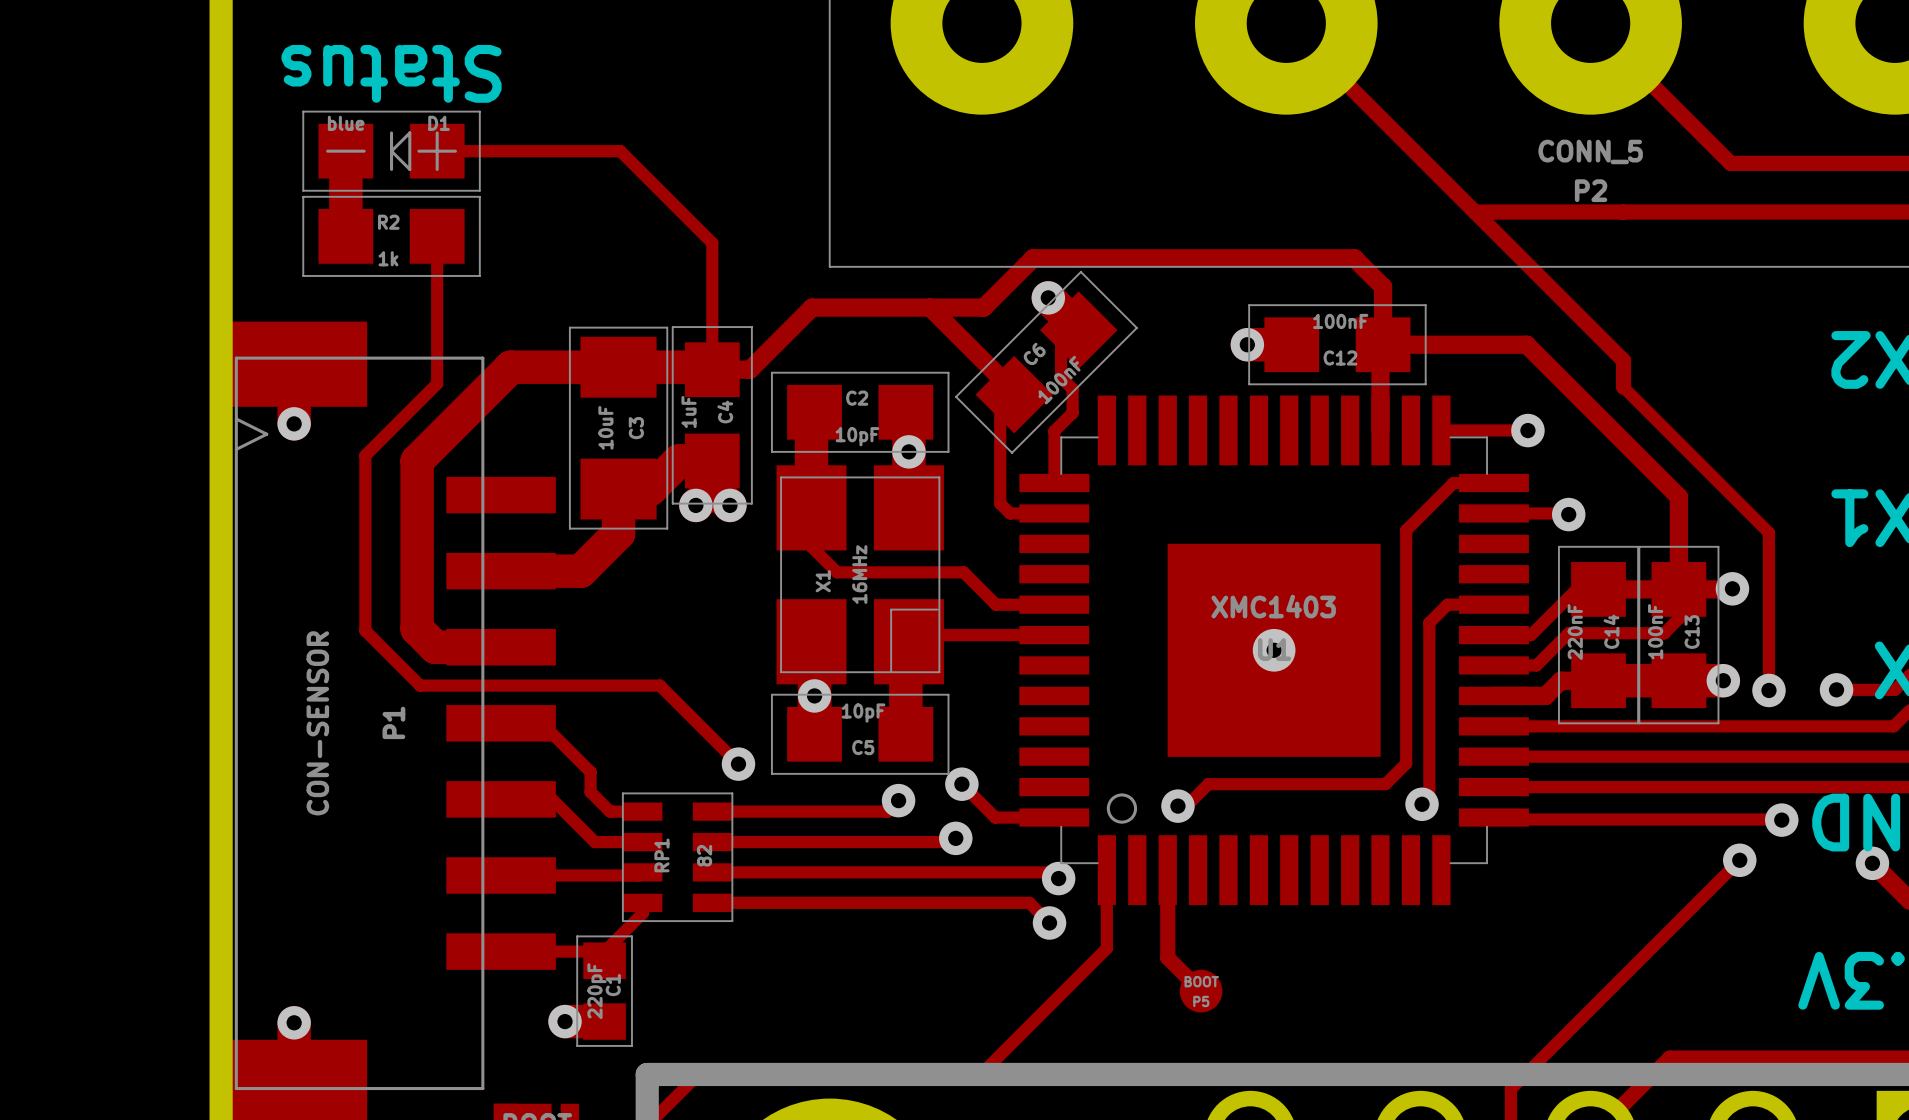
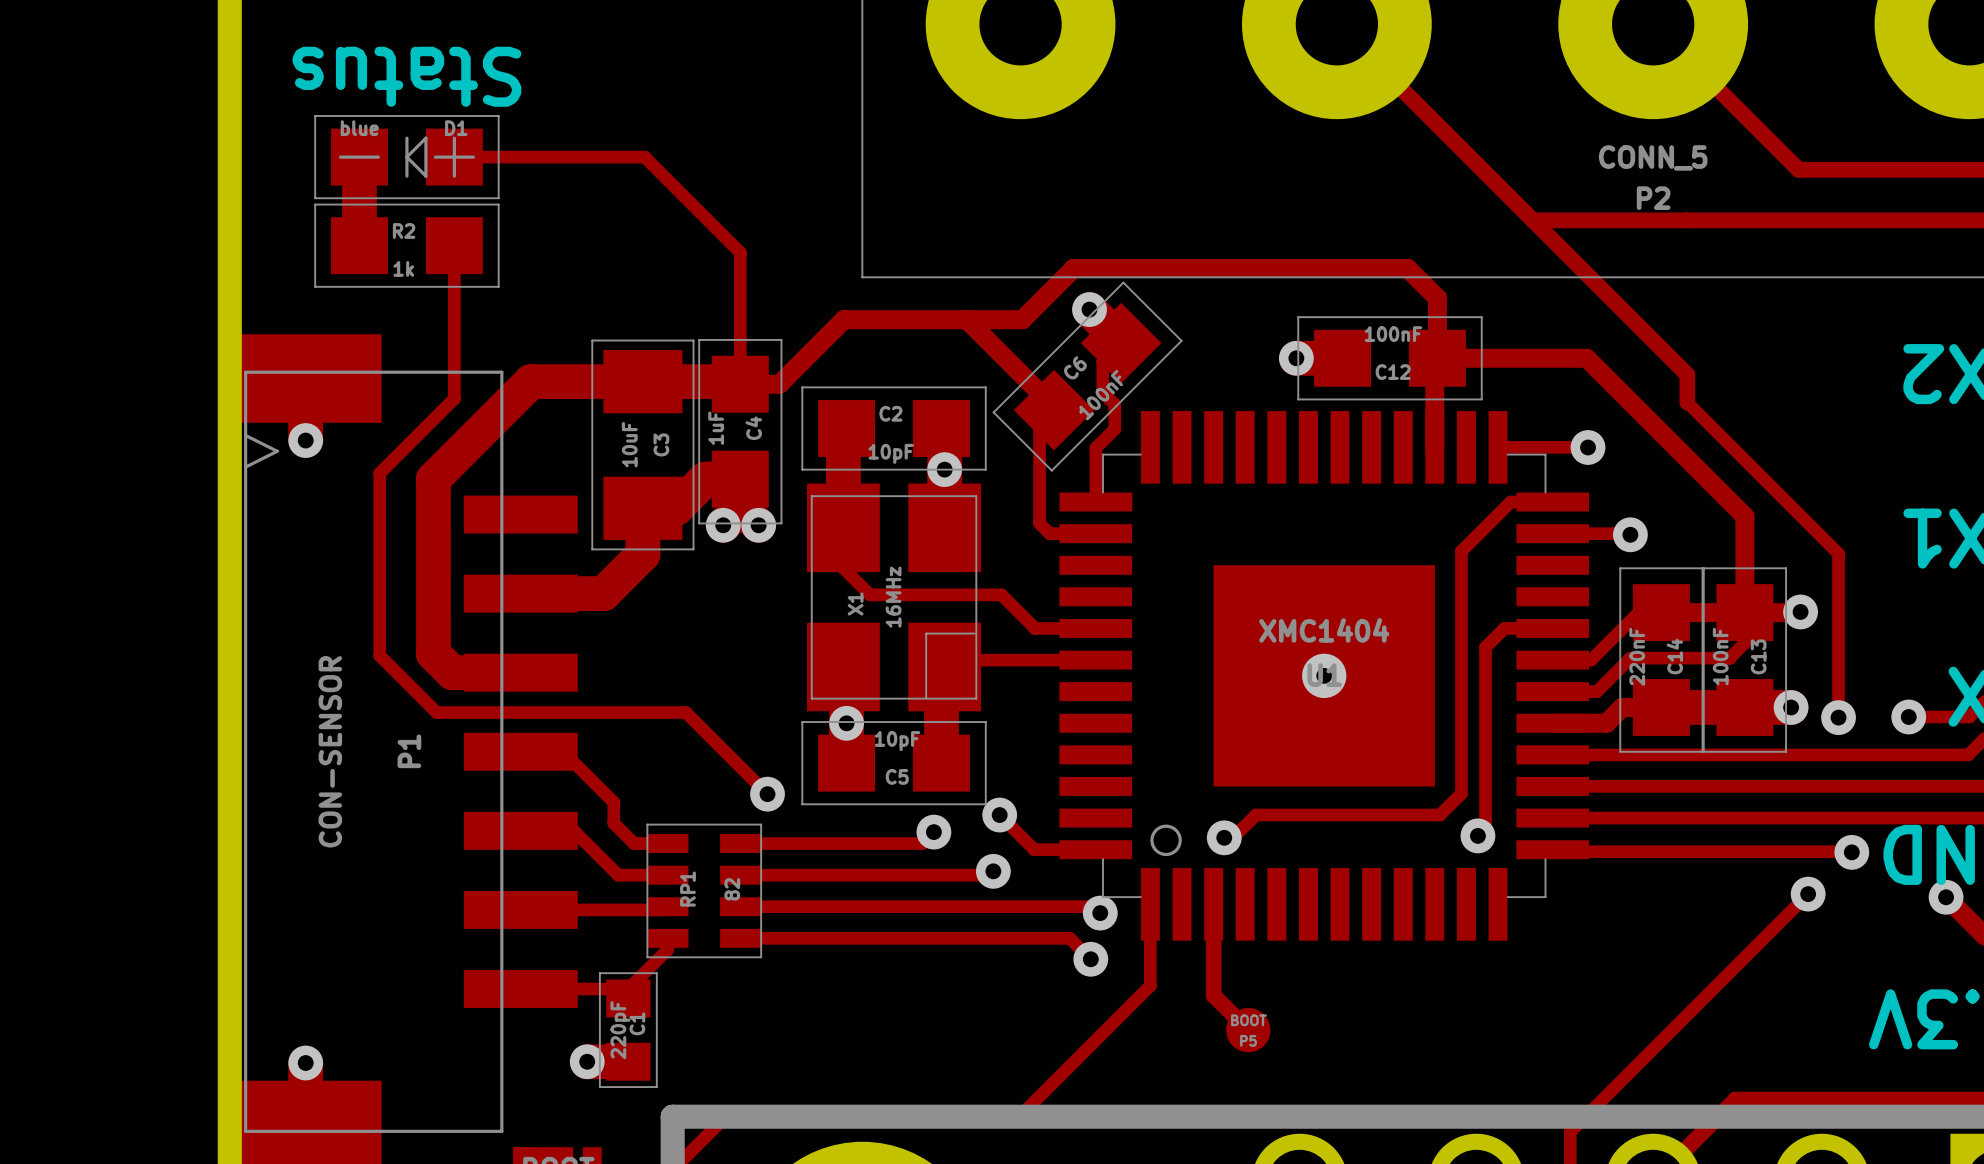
part value: XMC1403 (1273, 606) -> XMC1404 (1324, 630)

